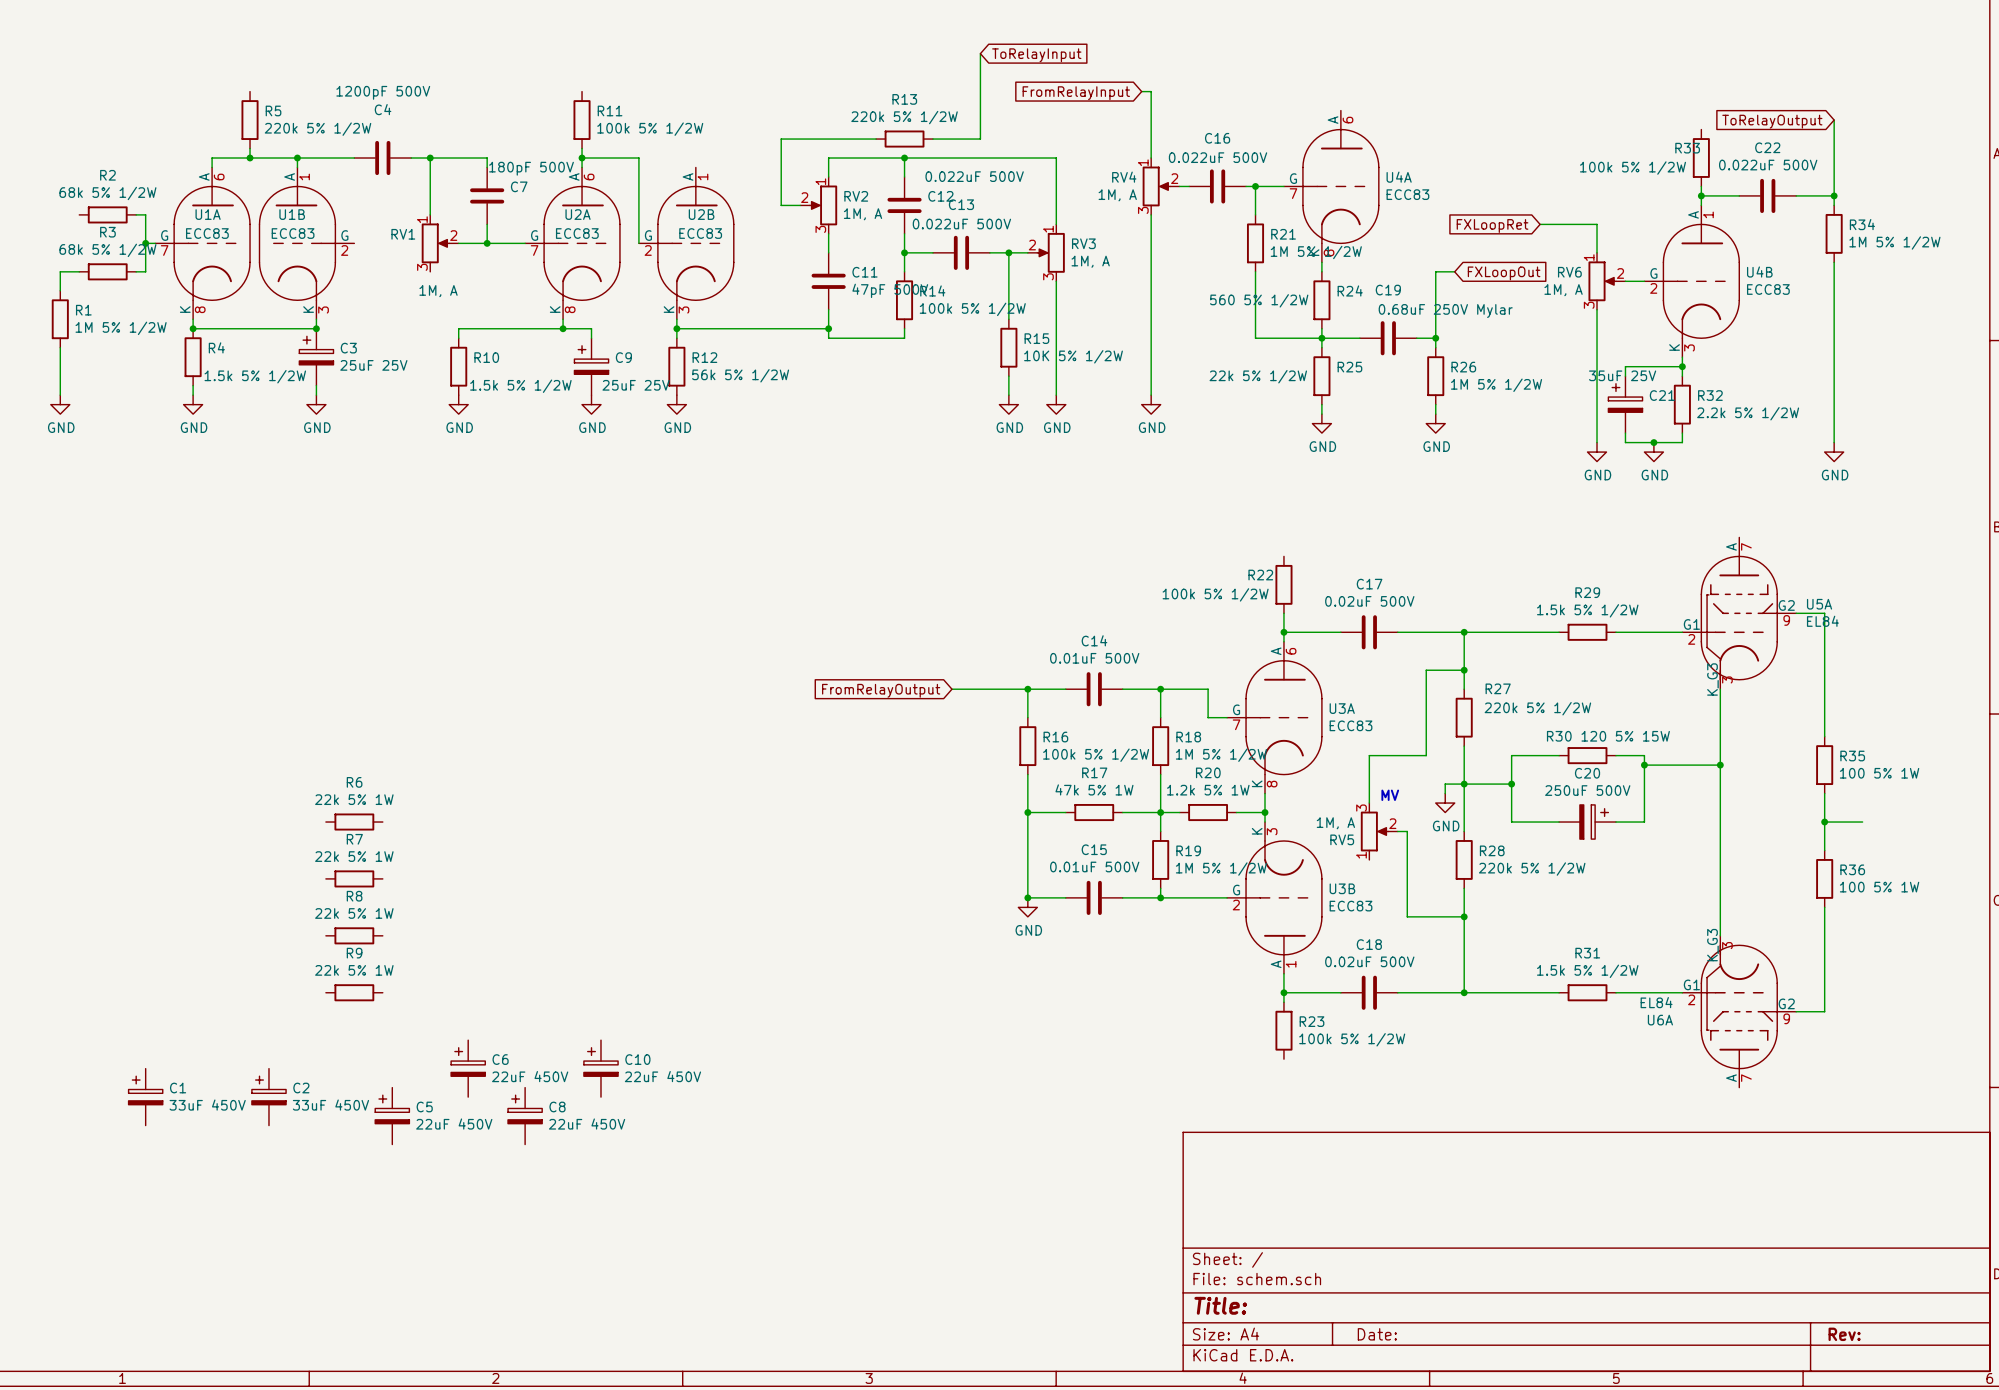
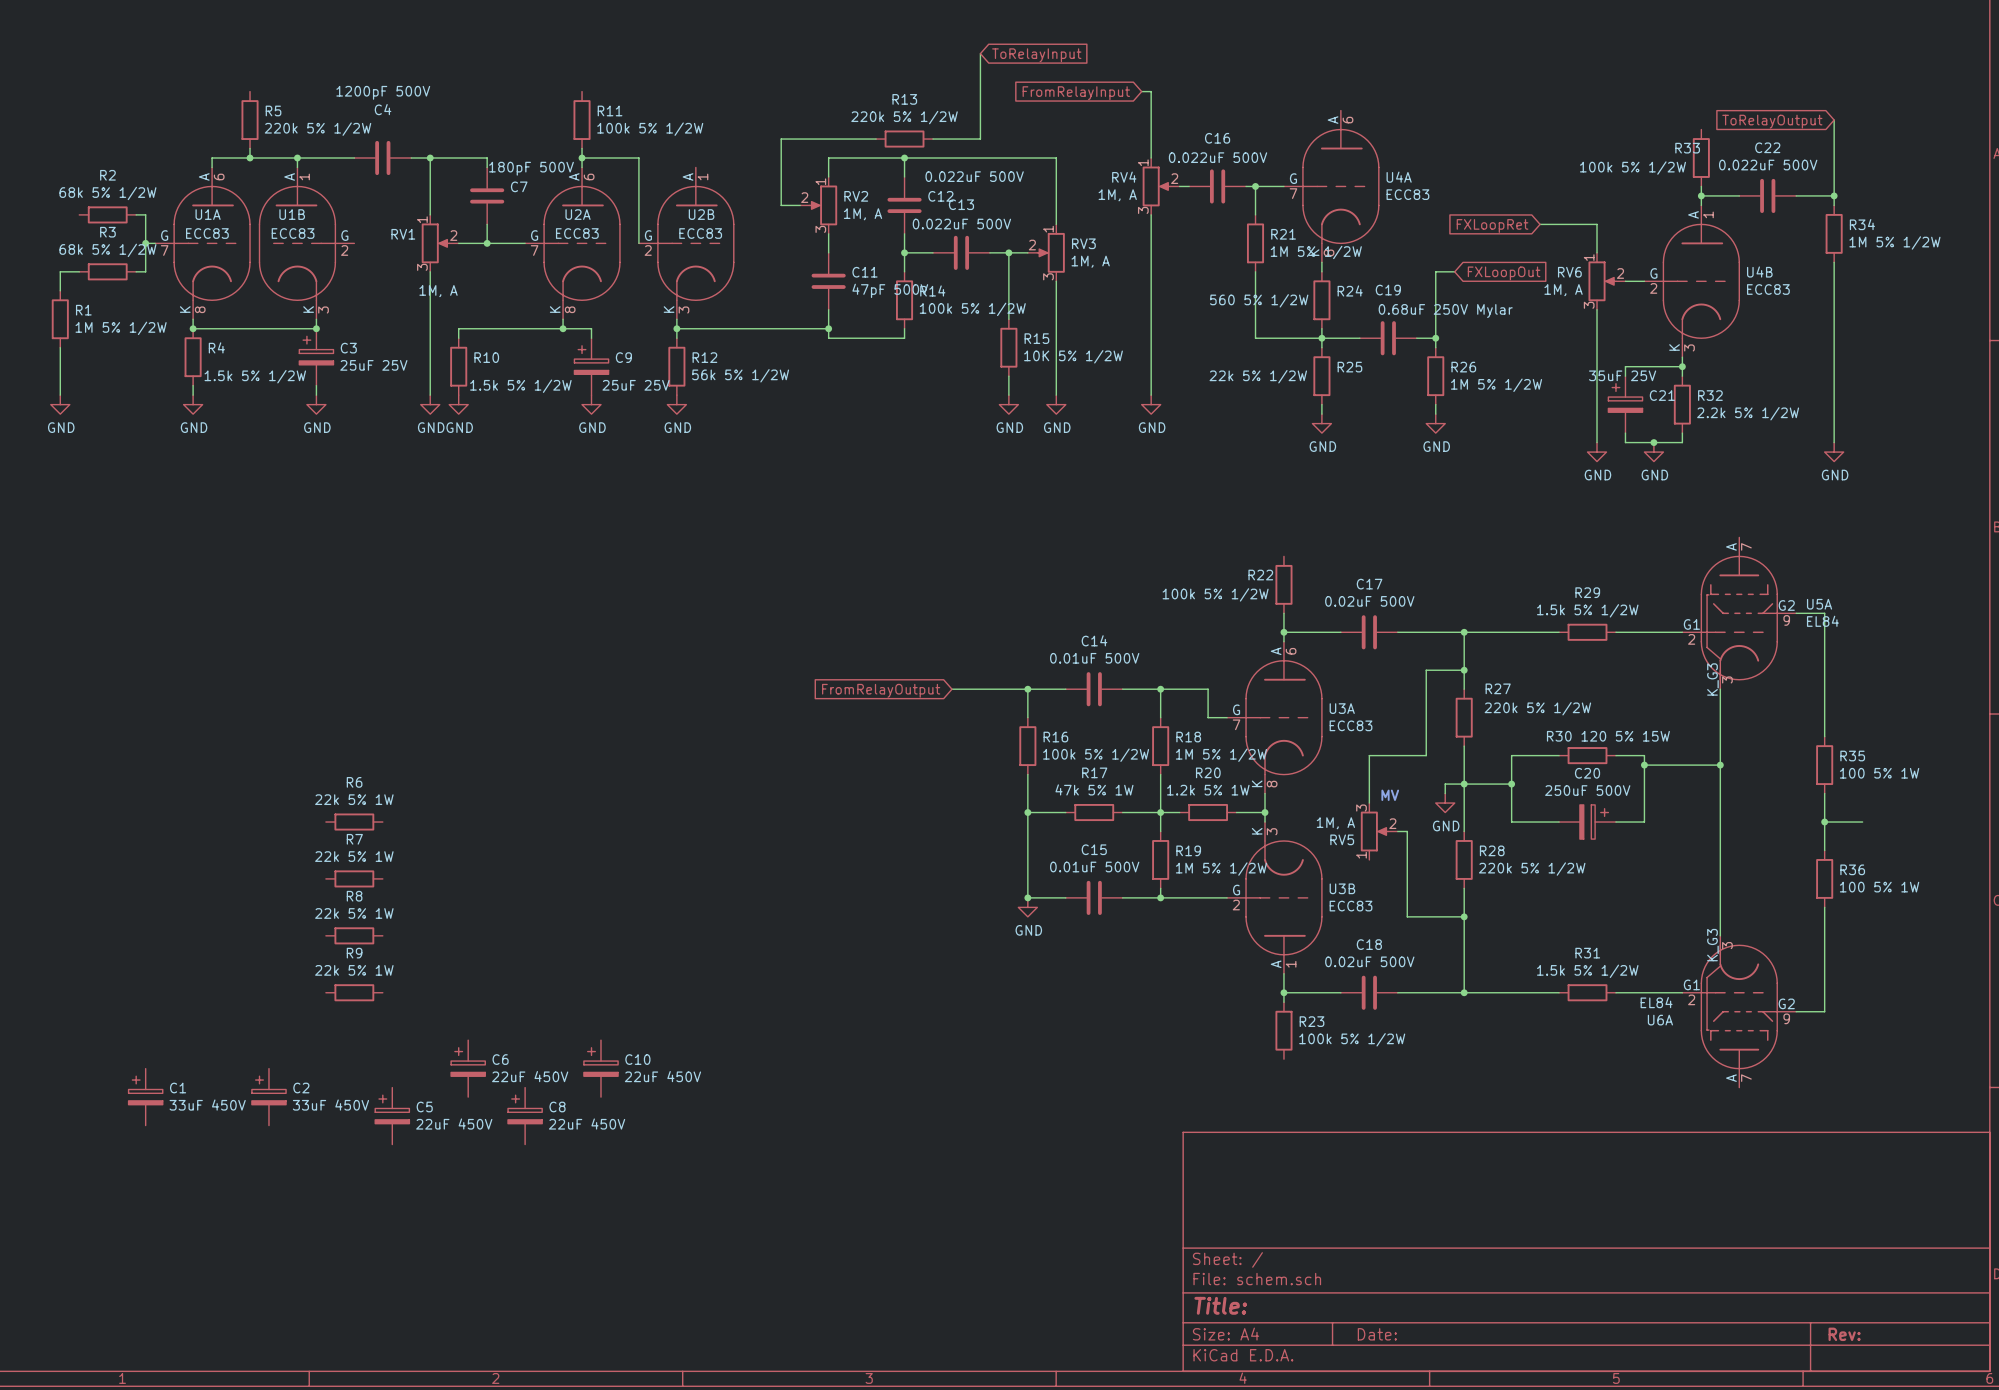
wire: none -> (430, 271) (430, 395)
power symbol: none -> GND (430, 404)

